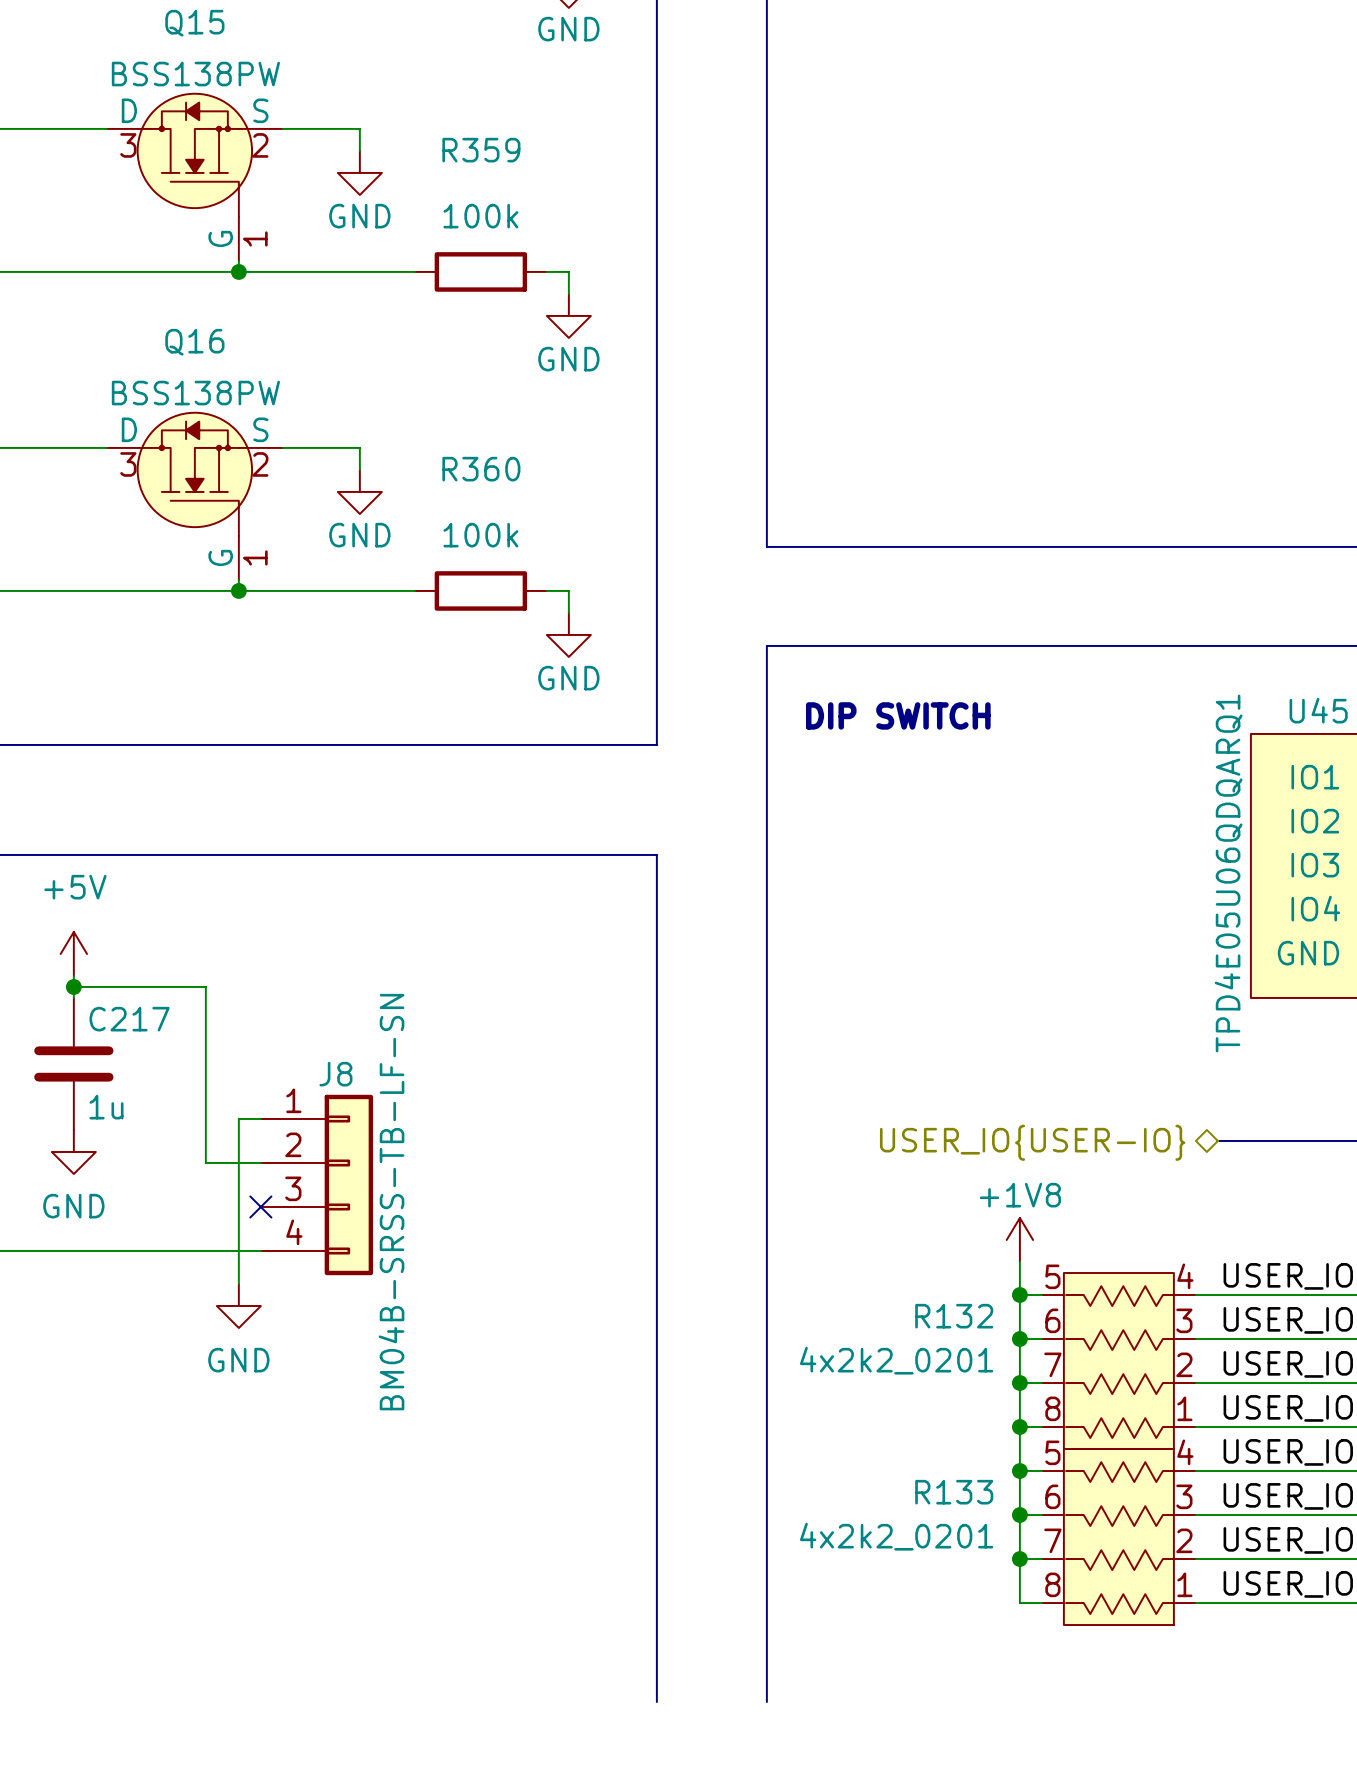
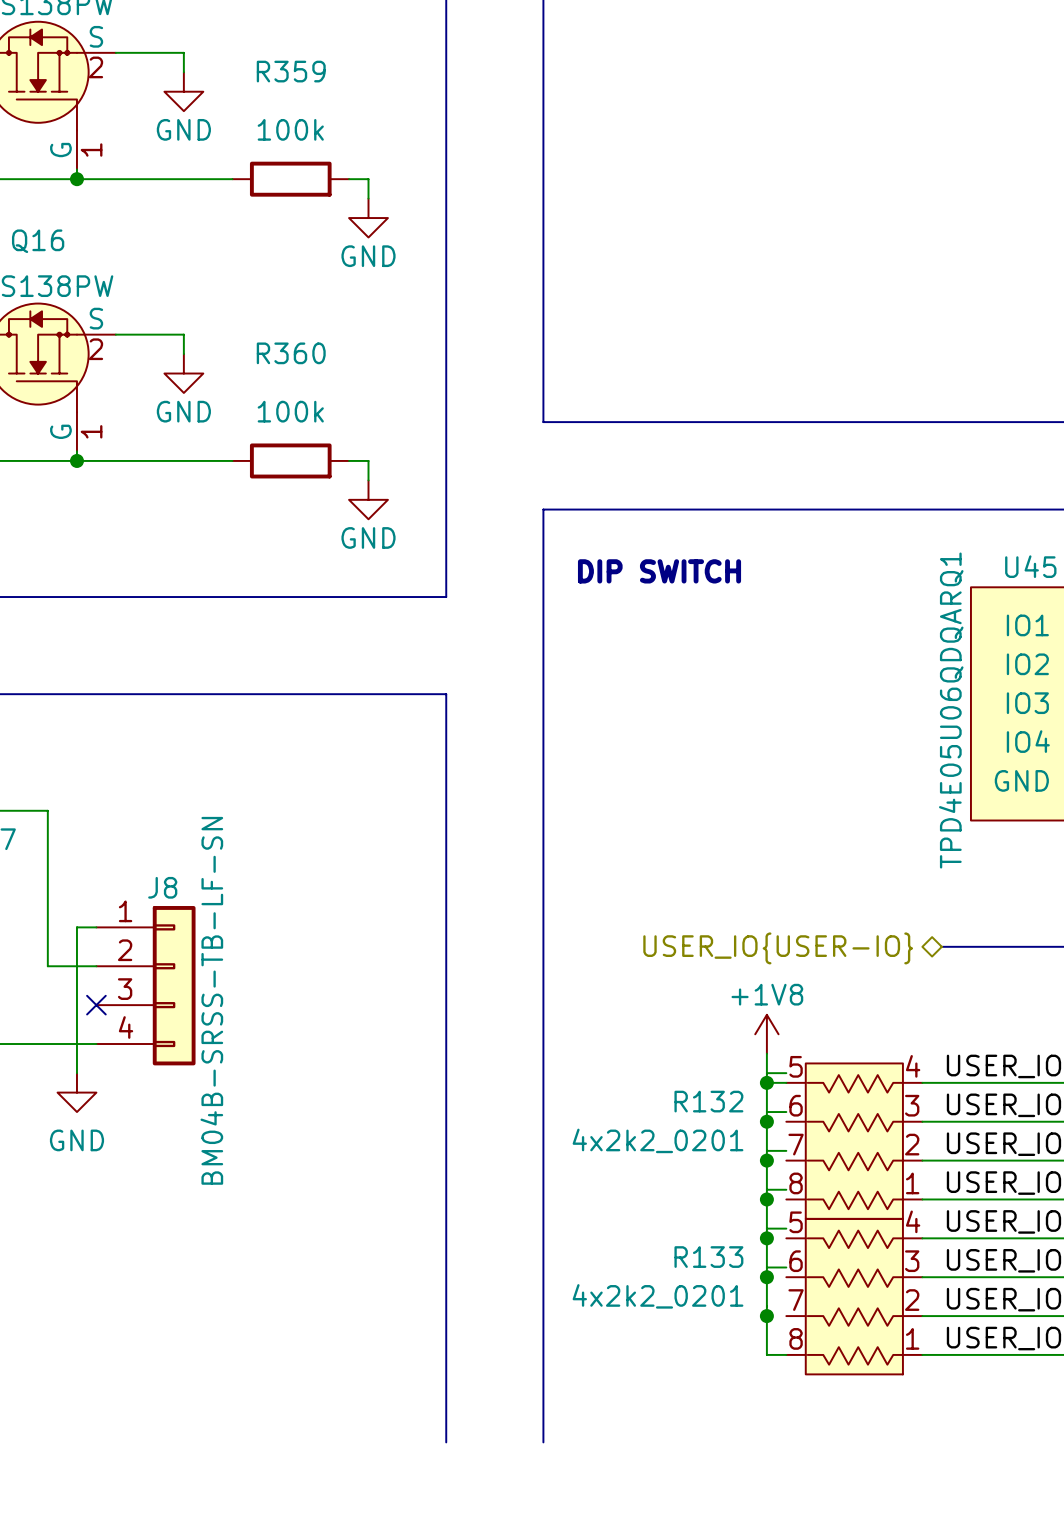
wire: (1019, 1338) (1041, 1338) -> (766, 1073) (786, 1073)
wire: (1019, 1382) (1041, 1382) -> (766, 1112) (786, 1112)
wire: (1019, 1427) (1041, 1427) -> (766, 1150) (786, 1150)
wire: (1019, 1471) (1041, 1471) -> (766, 1189) (786, 1189)
wire: (1019, 1515) (1041, 1515) -> (766, 1228) (786, 1228)
wire: (1019, 1559) (1041, 1559) -> (766, 1267) (786, 1267)

